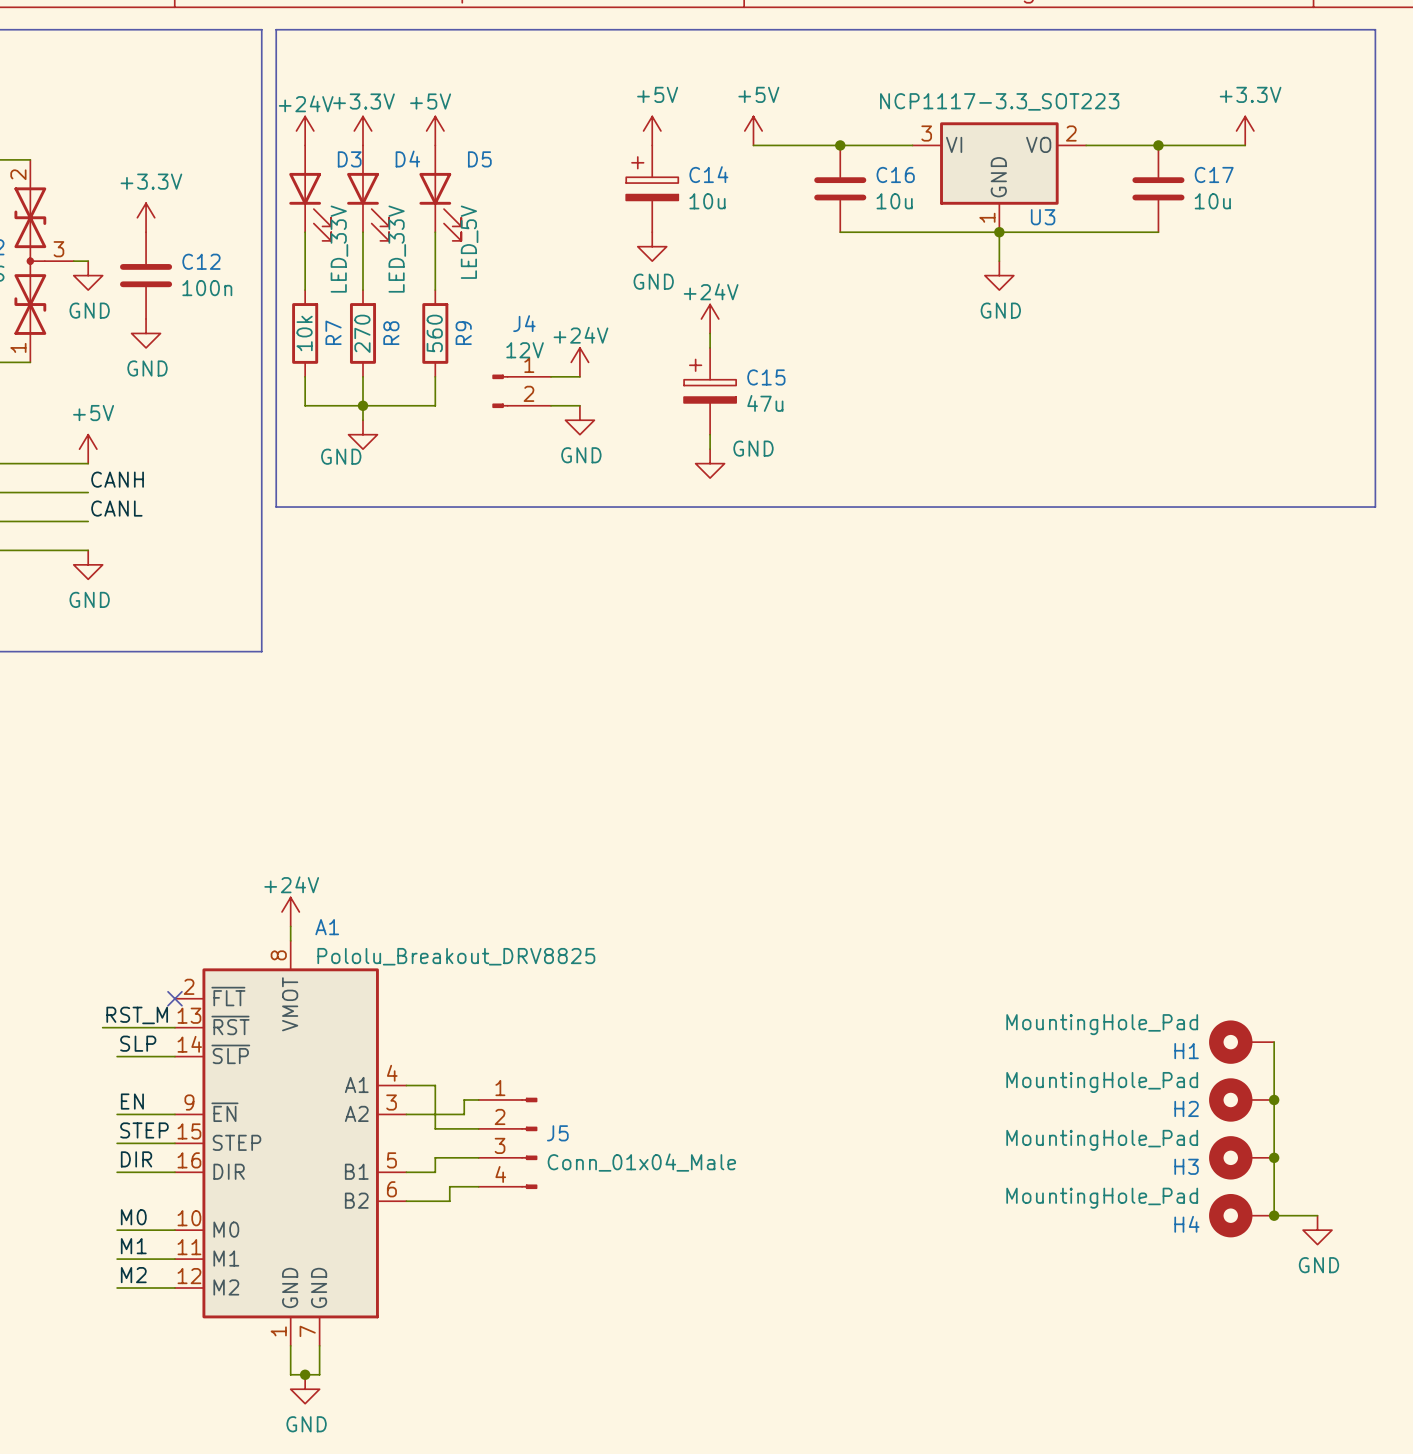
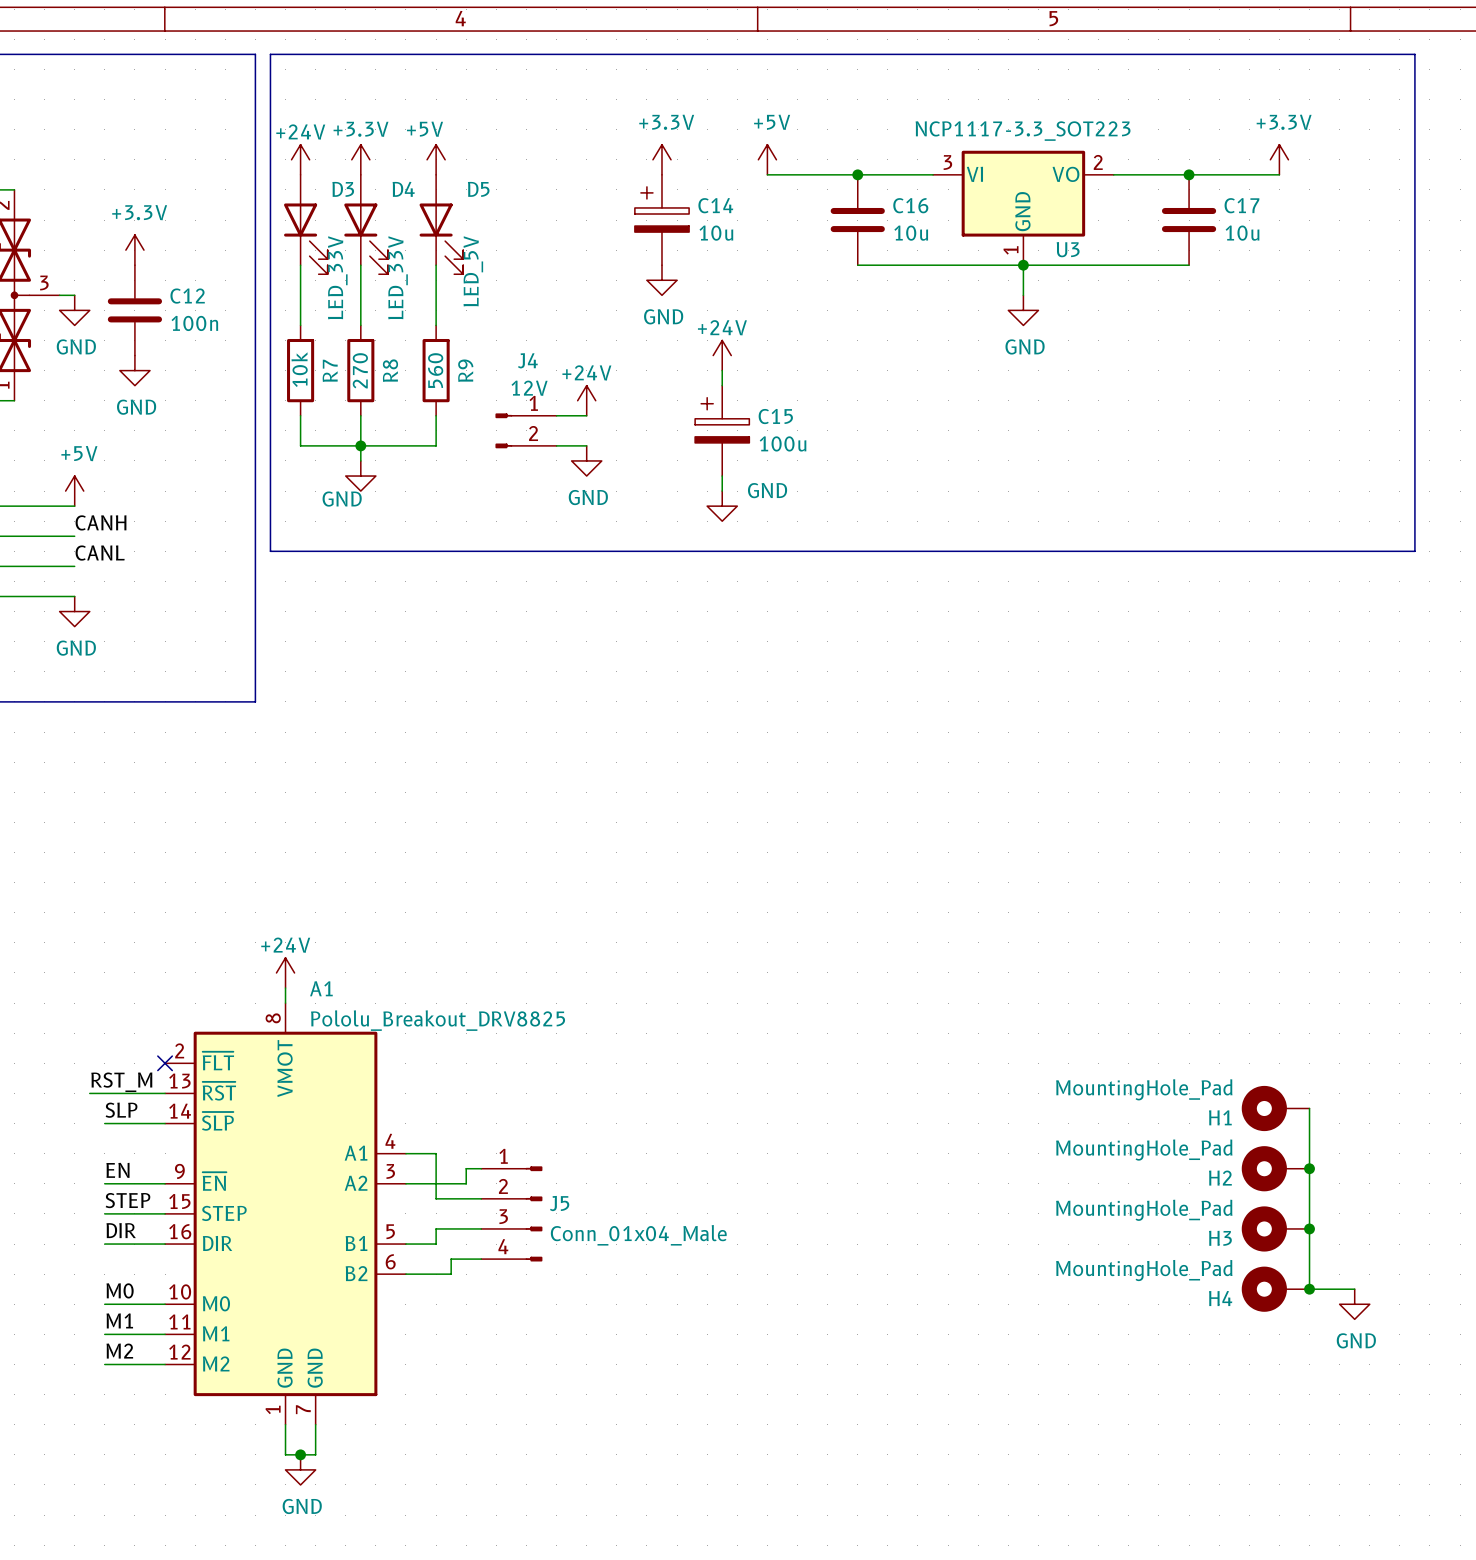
power symbol: +5V (652, 130) -> +3.3V (661, 159)
C15 value: 47u (765, 403) -> 100u (783, 443)

